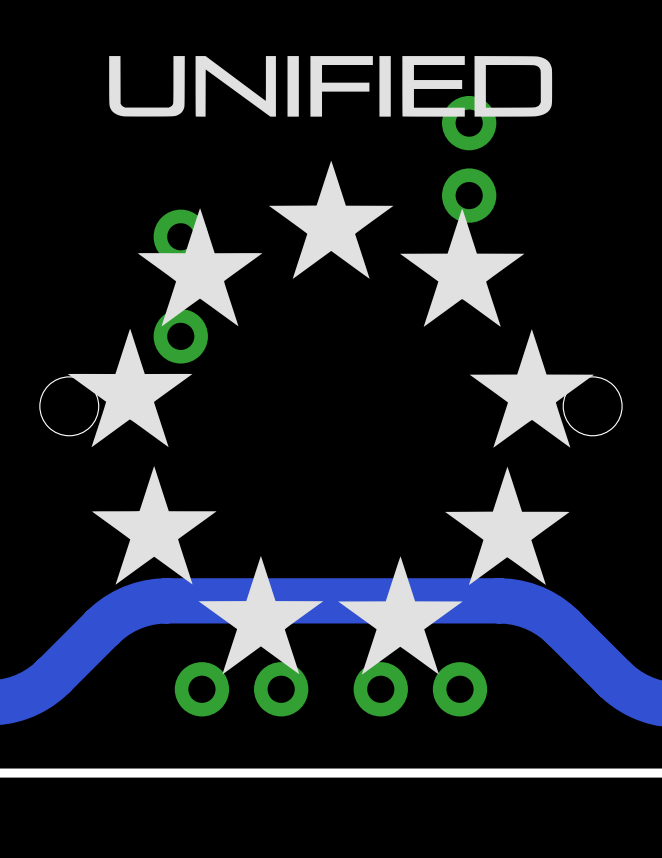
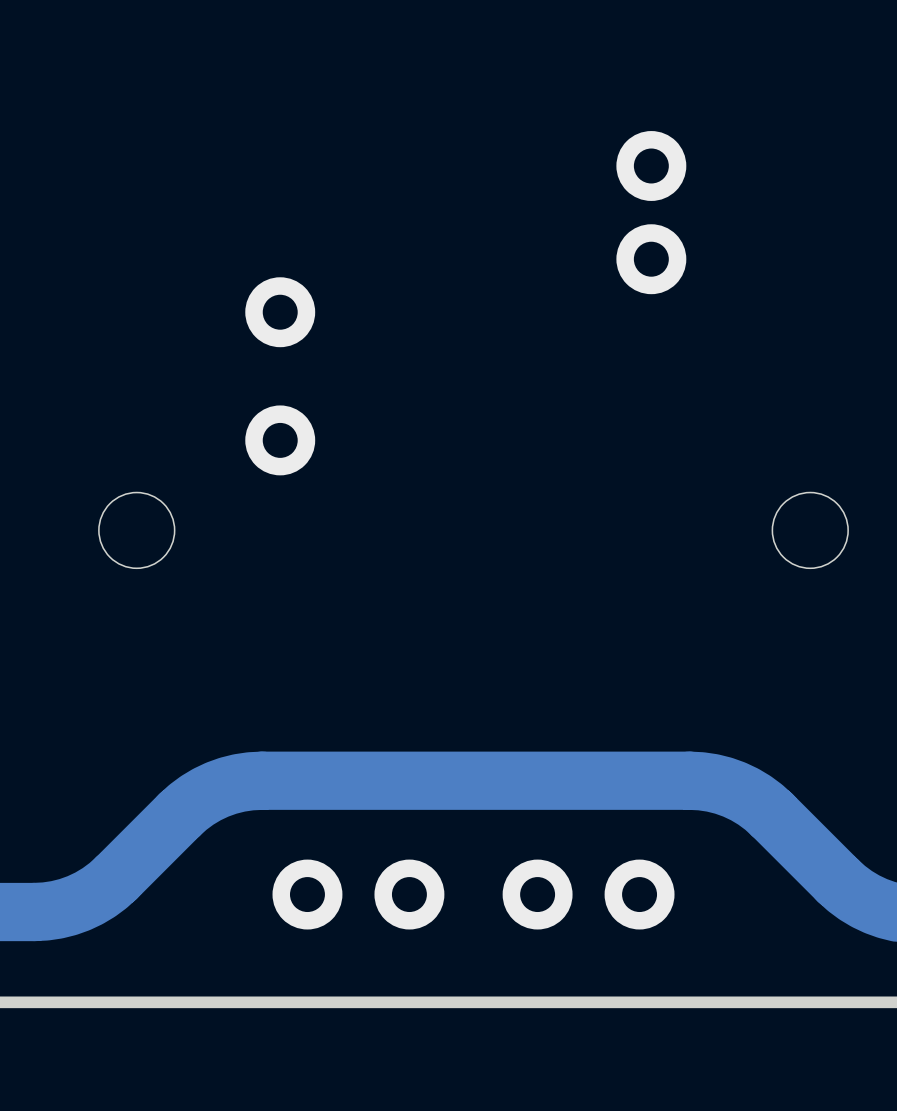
drawing: [67, 56, 595, 675] -> none

